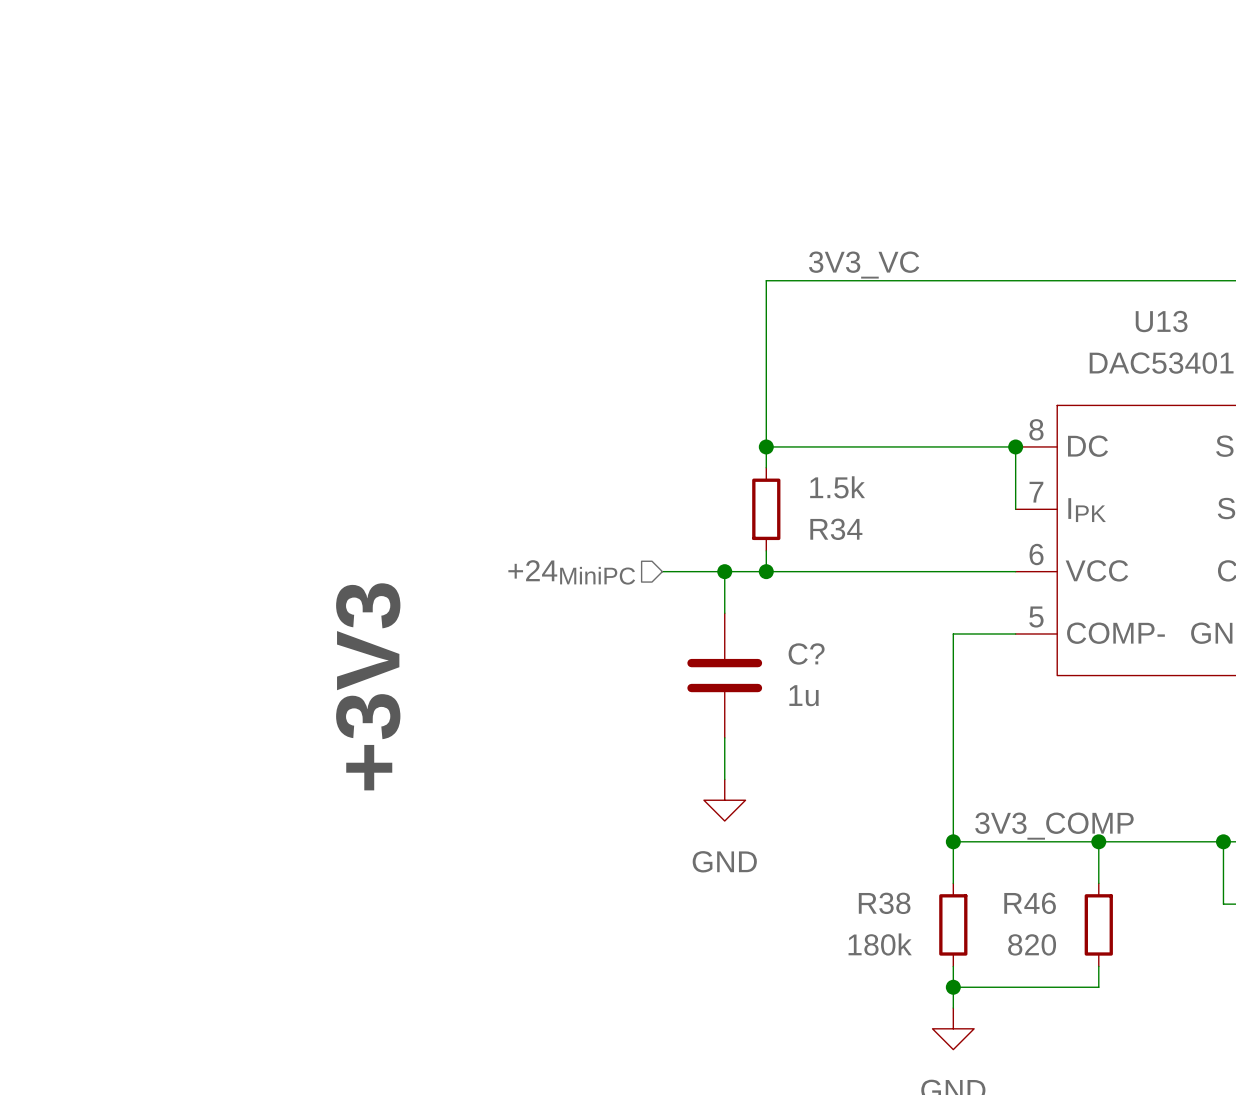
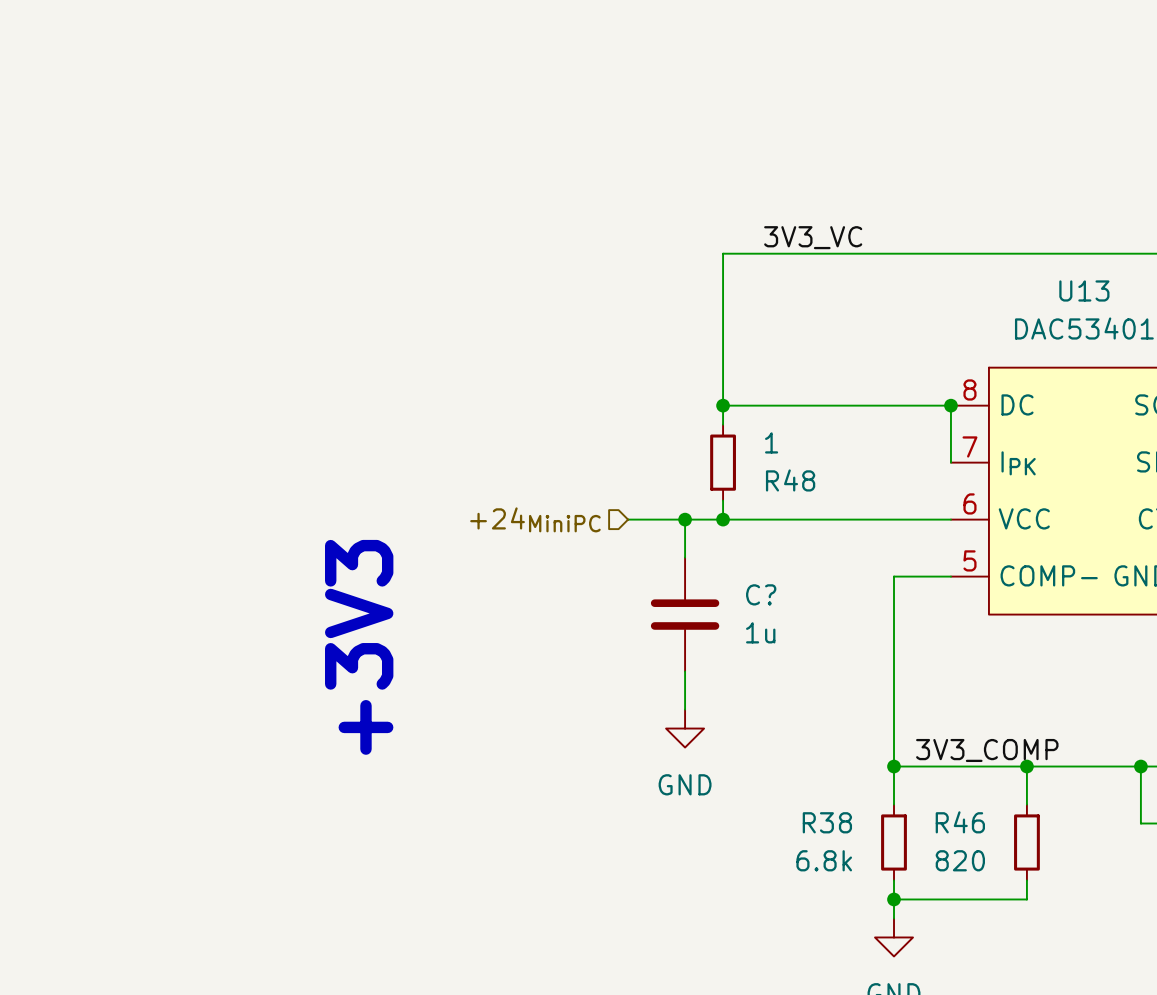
R34 value: 1.5k (837, 487) -> 1 (771, 442)
R34 name: R34 (836, 529) -> R48 (790, 480)
R38 value: 180k (880, 944) -> 6.8k (824, 860)

